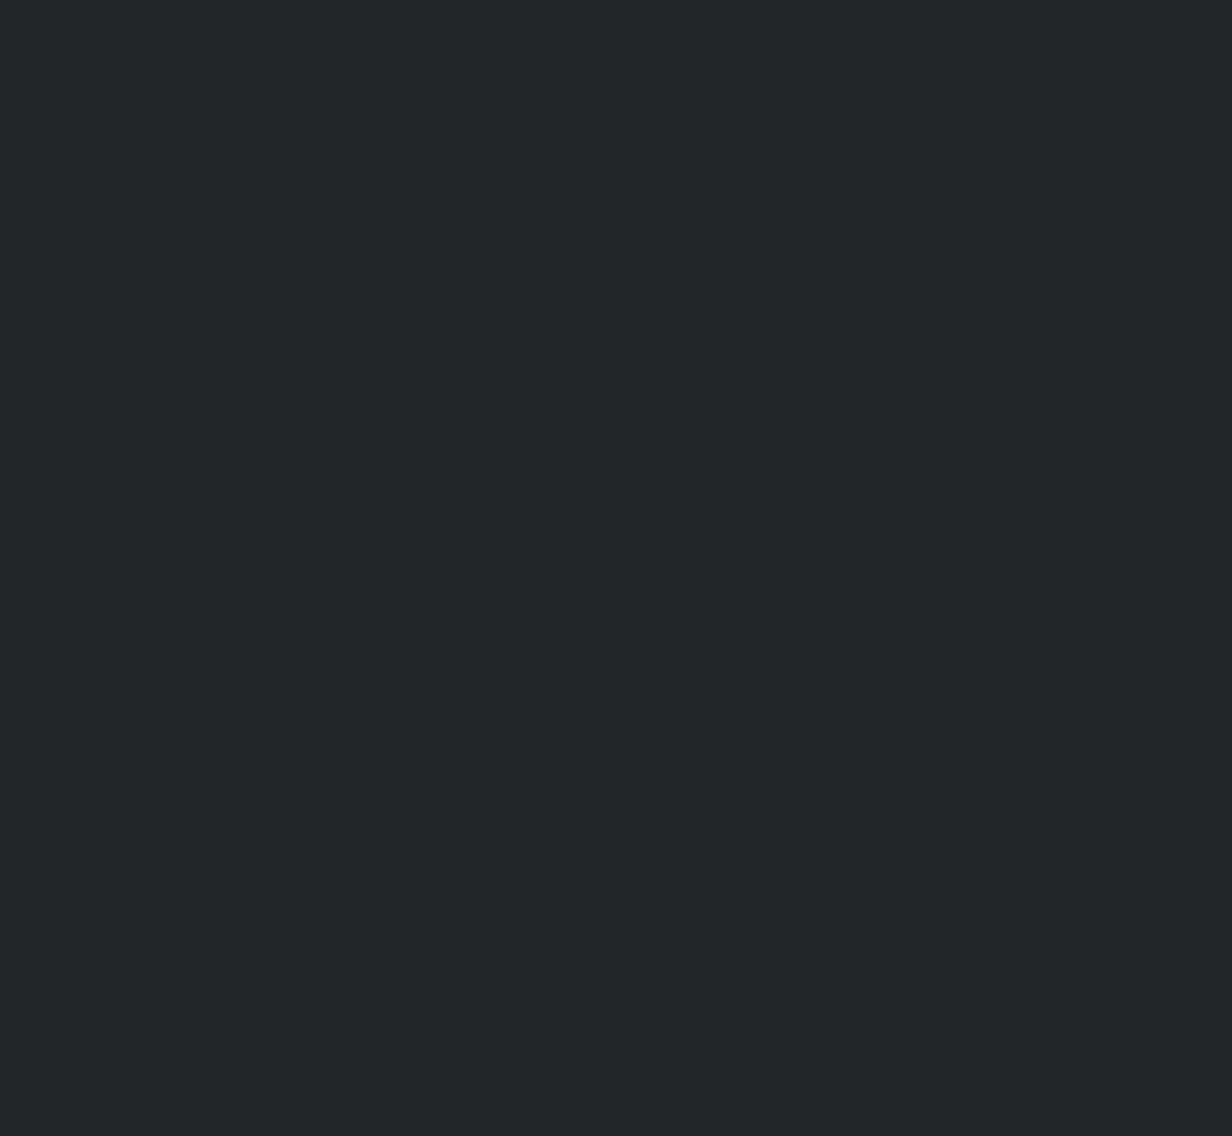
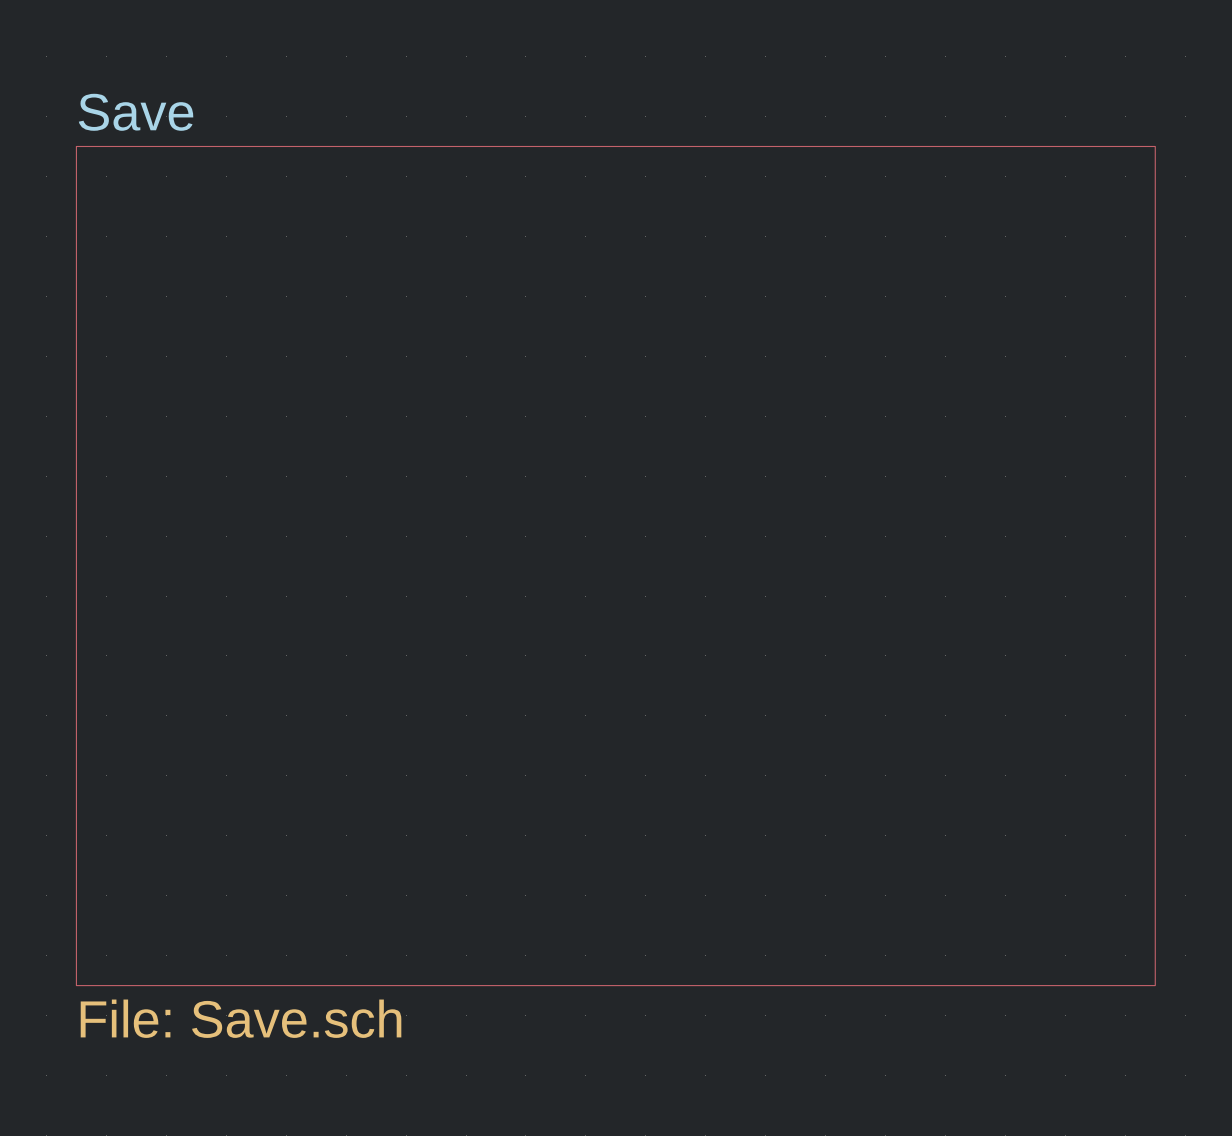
sheet Save: none -> File: Save.sch (615, 566)

